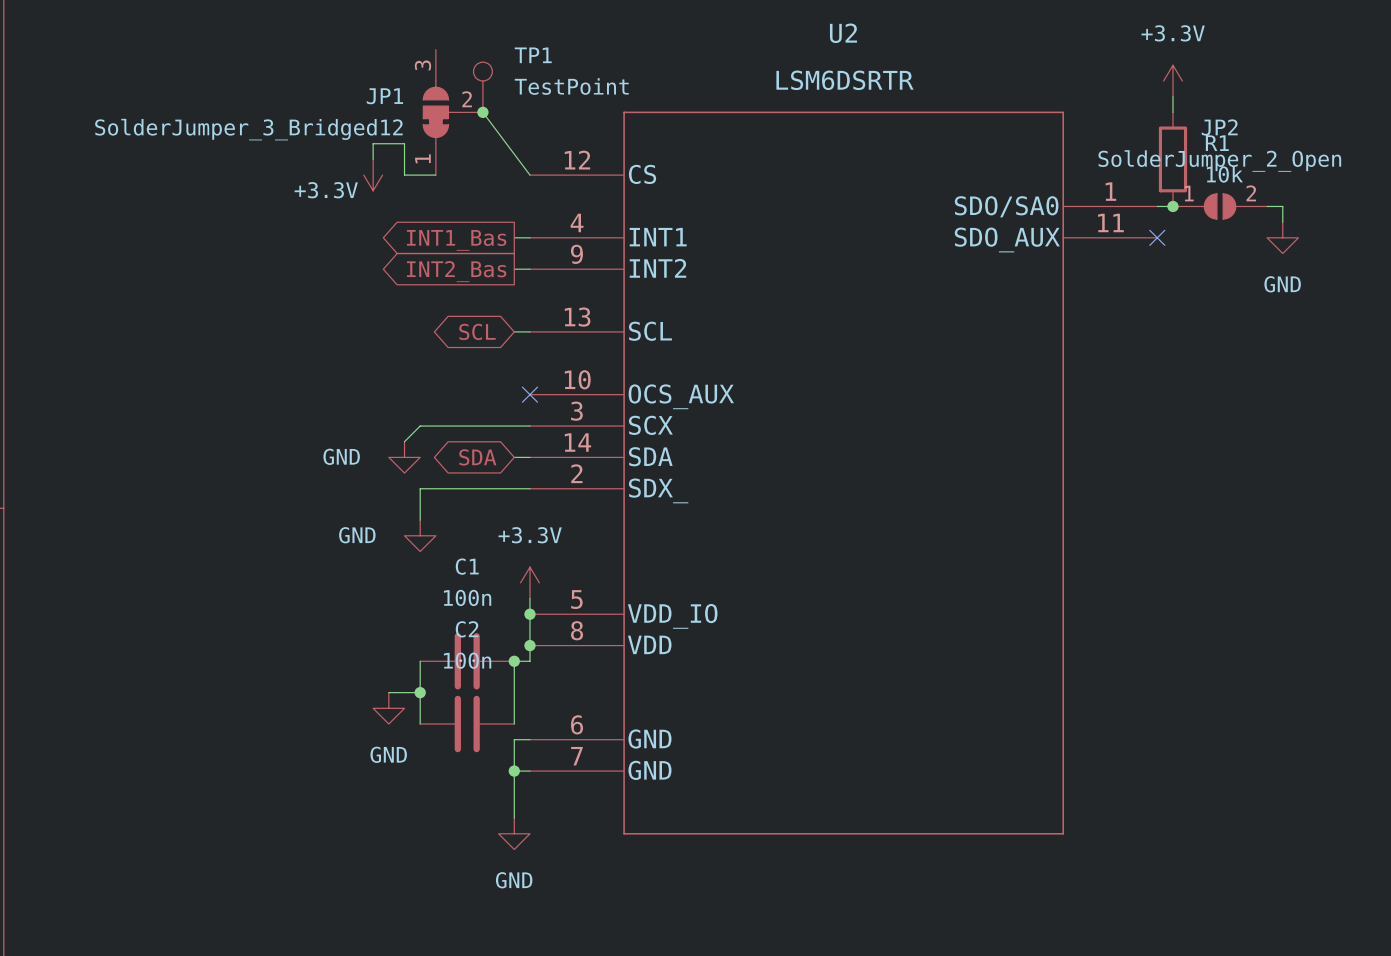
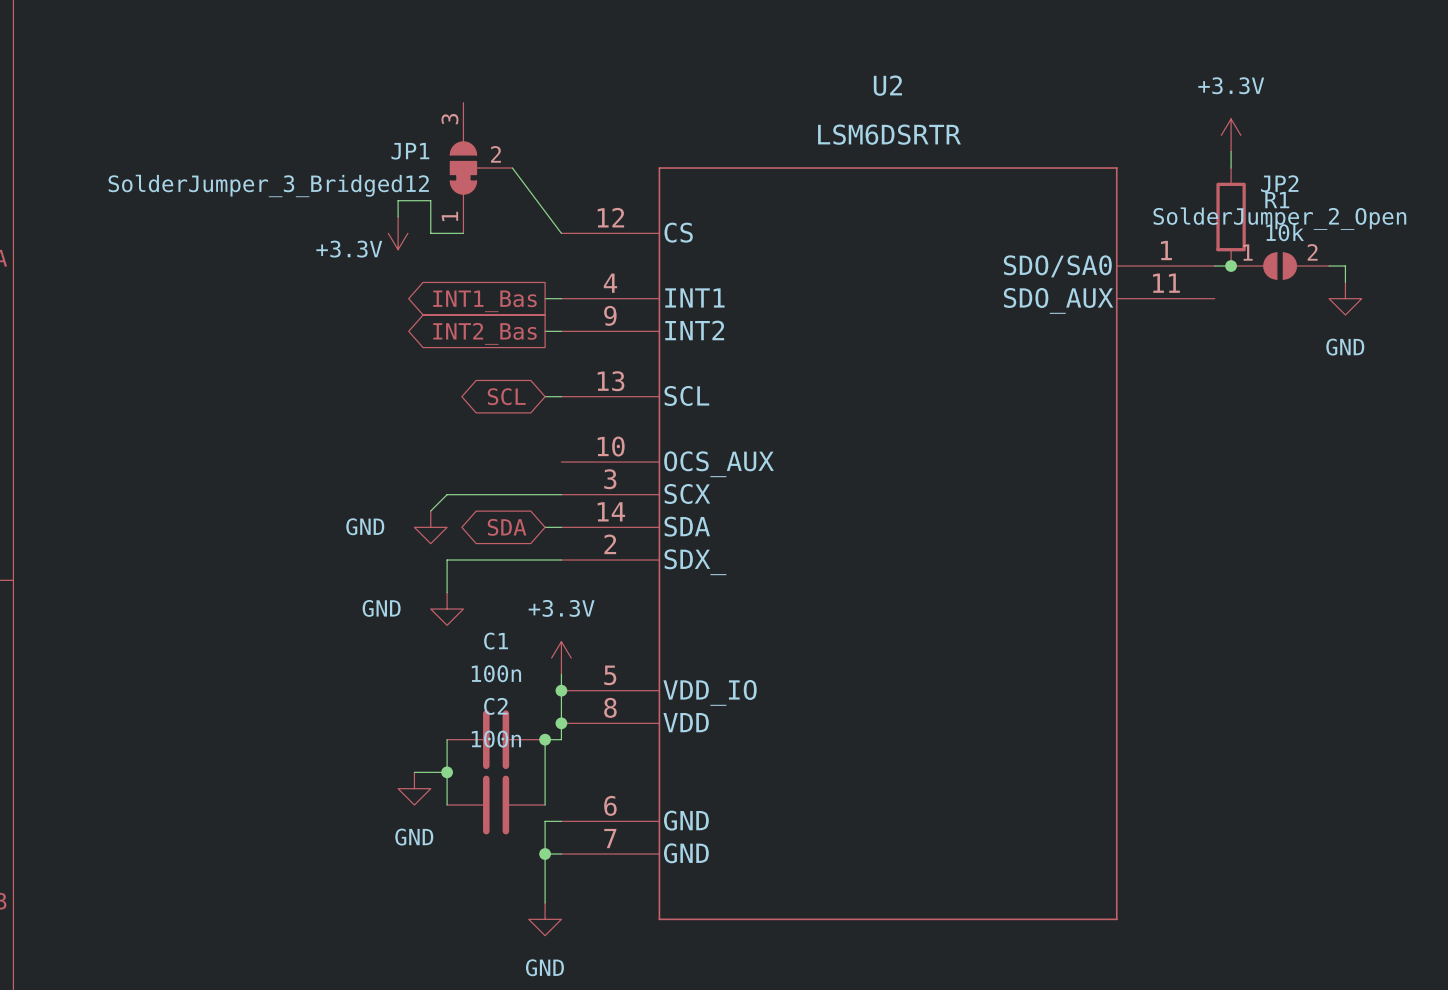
TP1: TestPoint (482, 87) -> none
junction: (482, 112) -> none
no-connect mark: (1157, 237) -> none
no-connect mark: (529, 394) -> none

